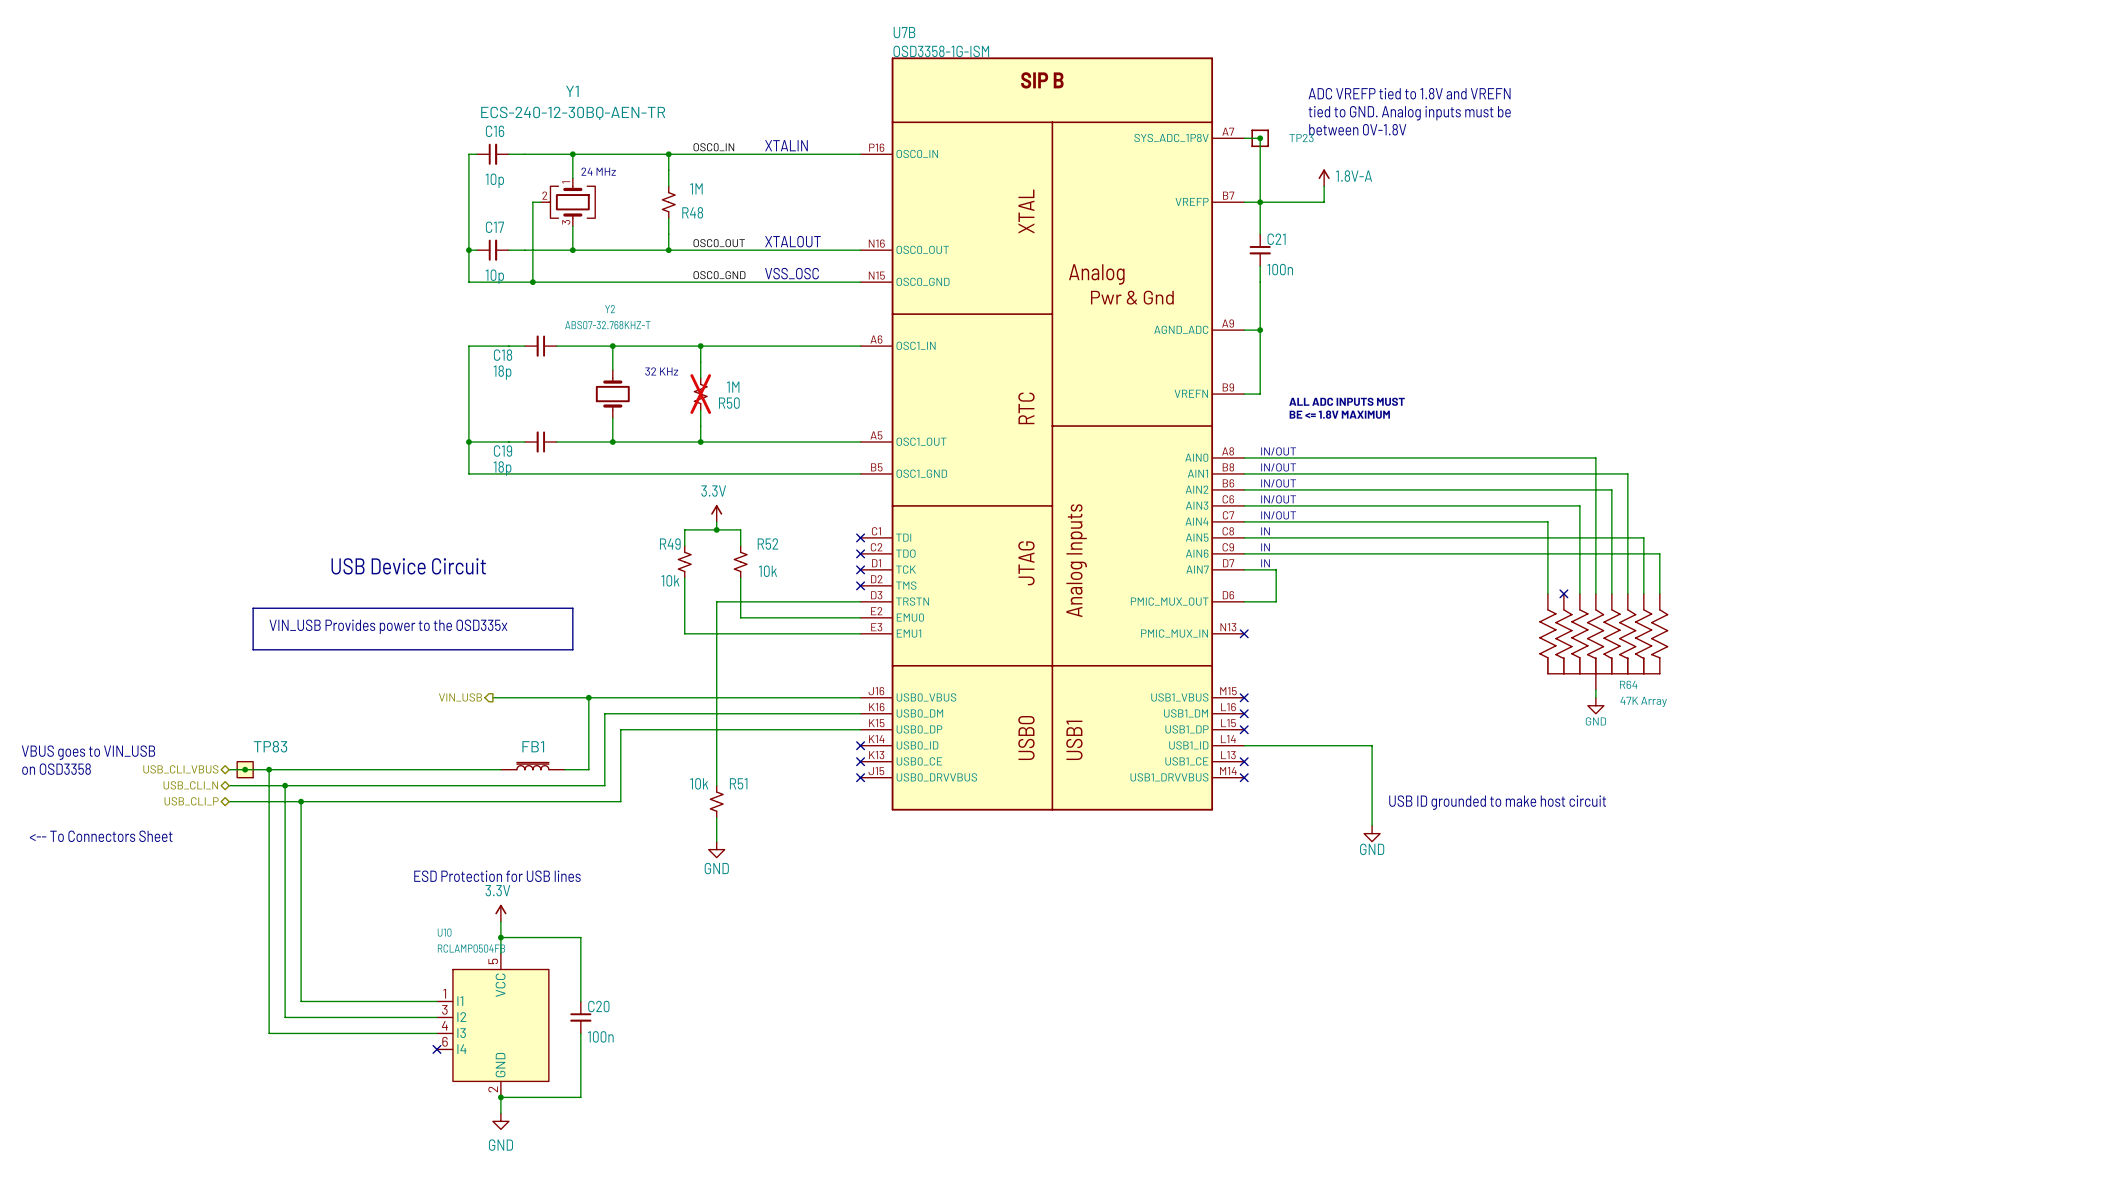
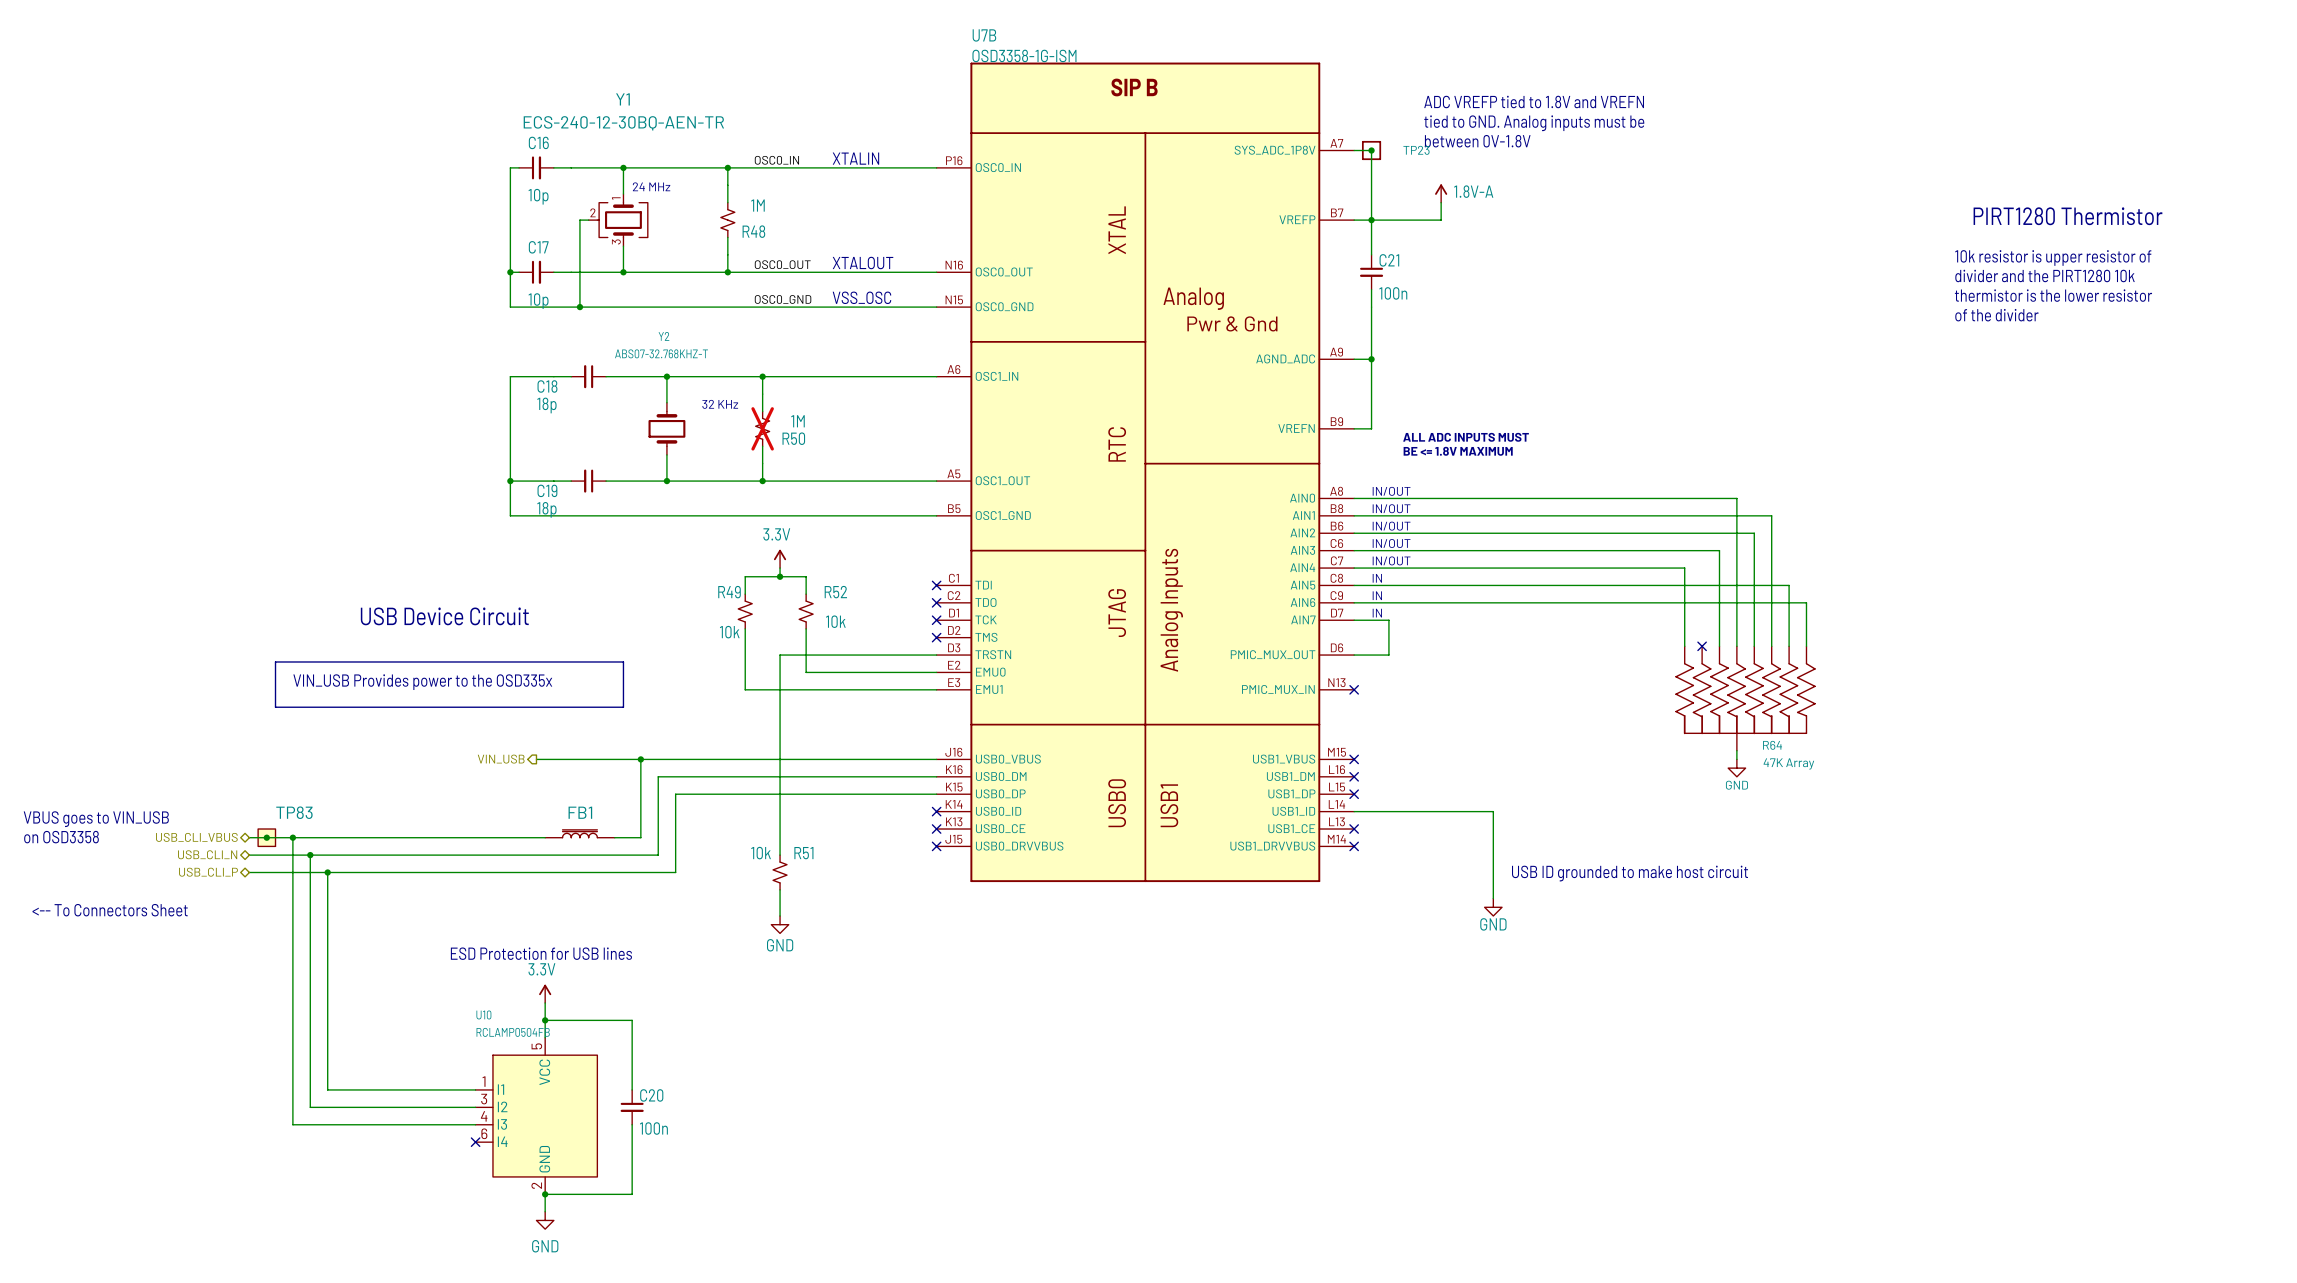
text: none -> PIRT1280 Thermistor (2068, 216)
text: none -> 10k resistor is upper resistor of (2053, 257)
text: none -> divider and the PIRT1280 10k (2045, 275)
text: none -> thermistor is the lower resistor (2053, 295)
text: none -> of the divider (1996, 315)

